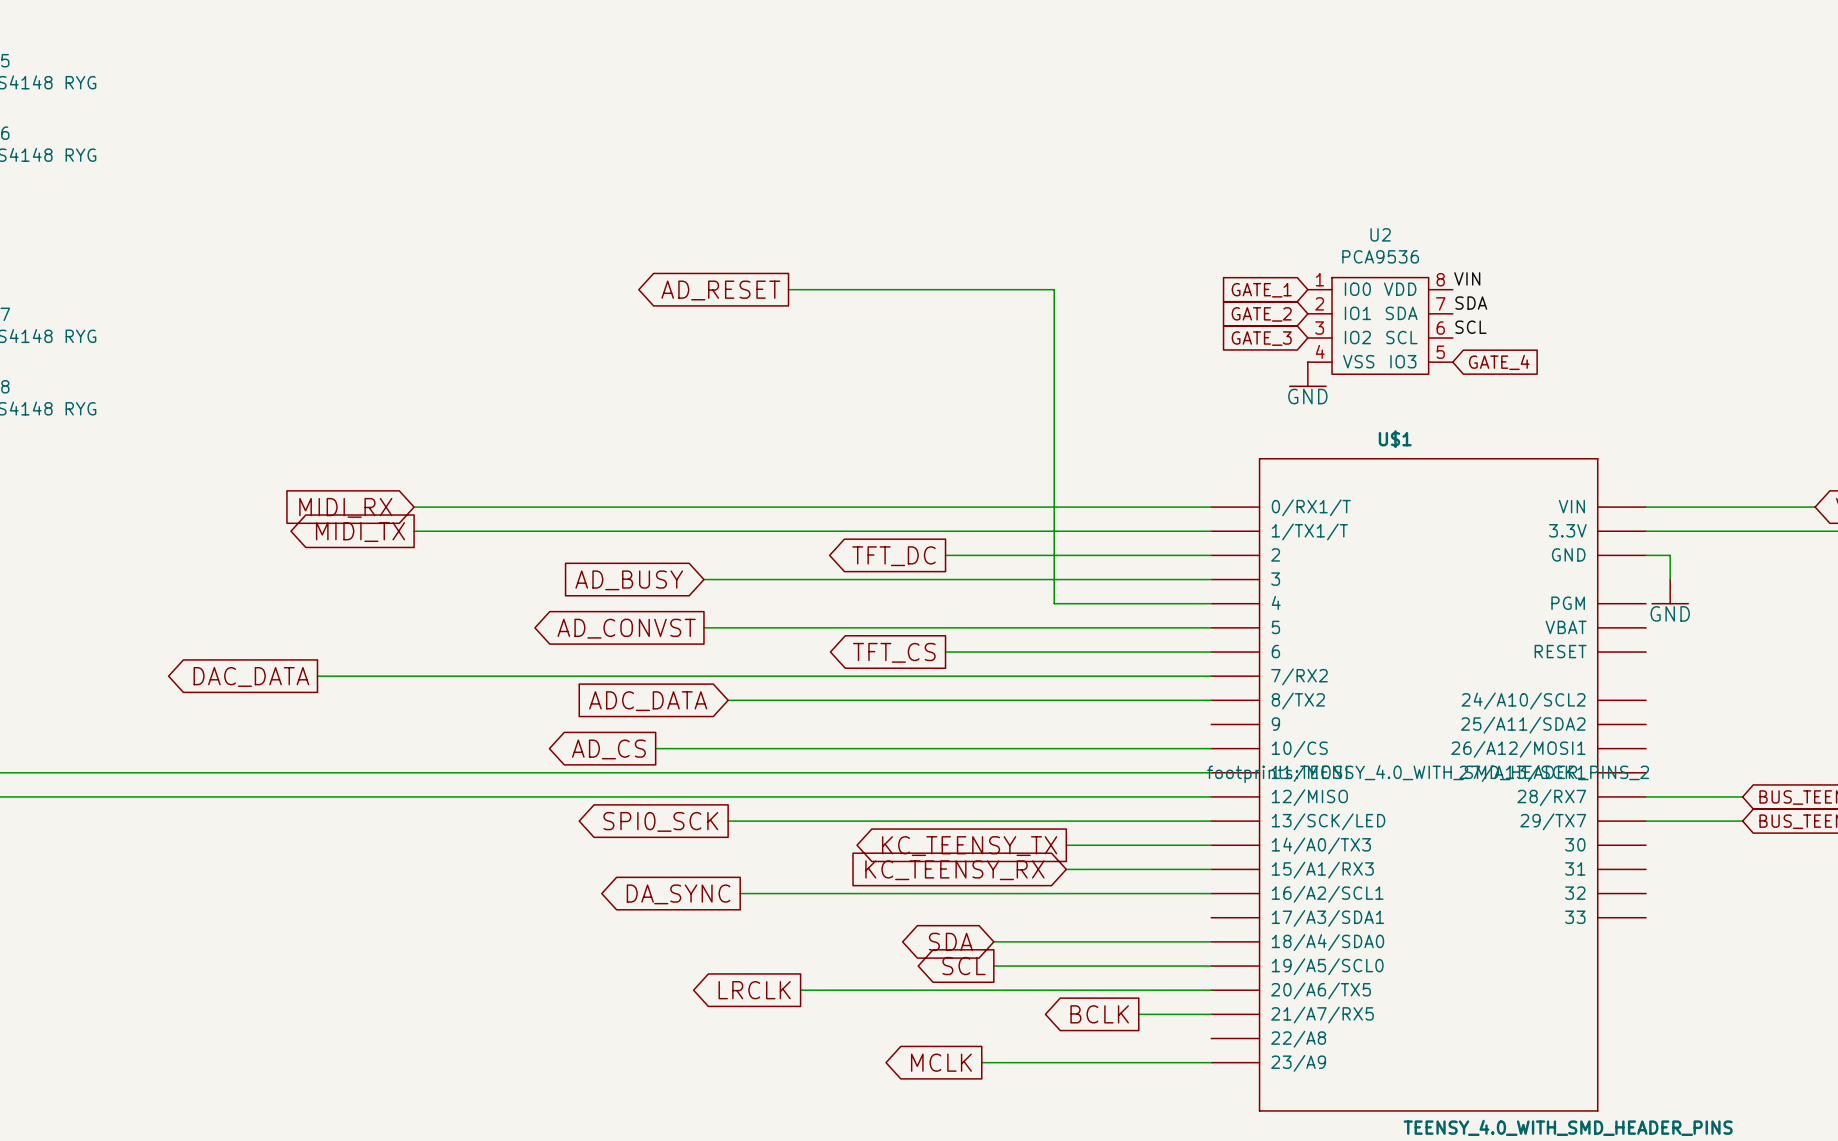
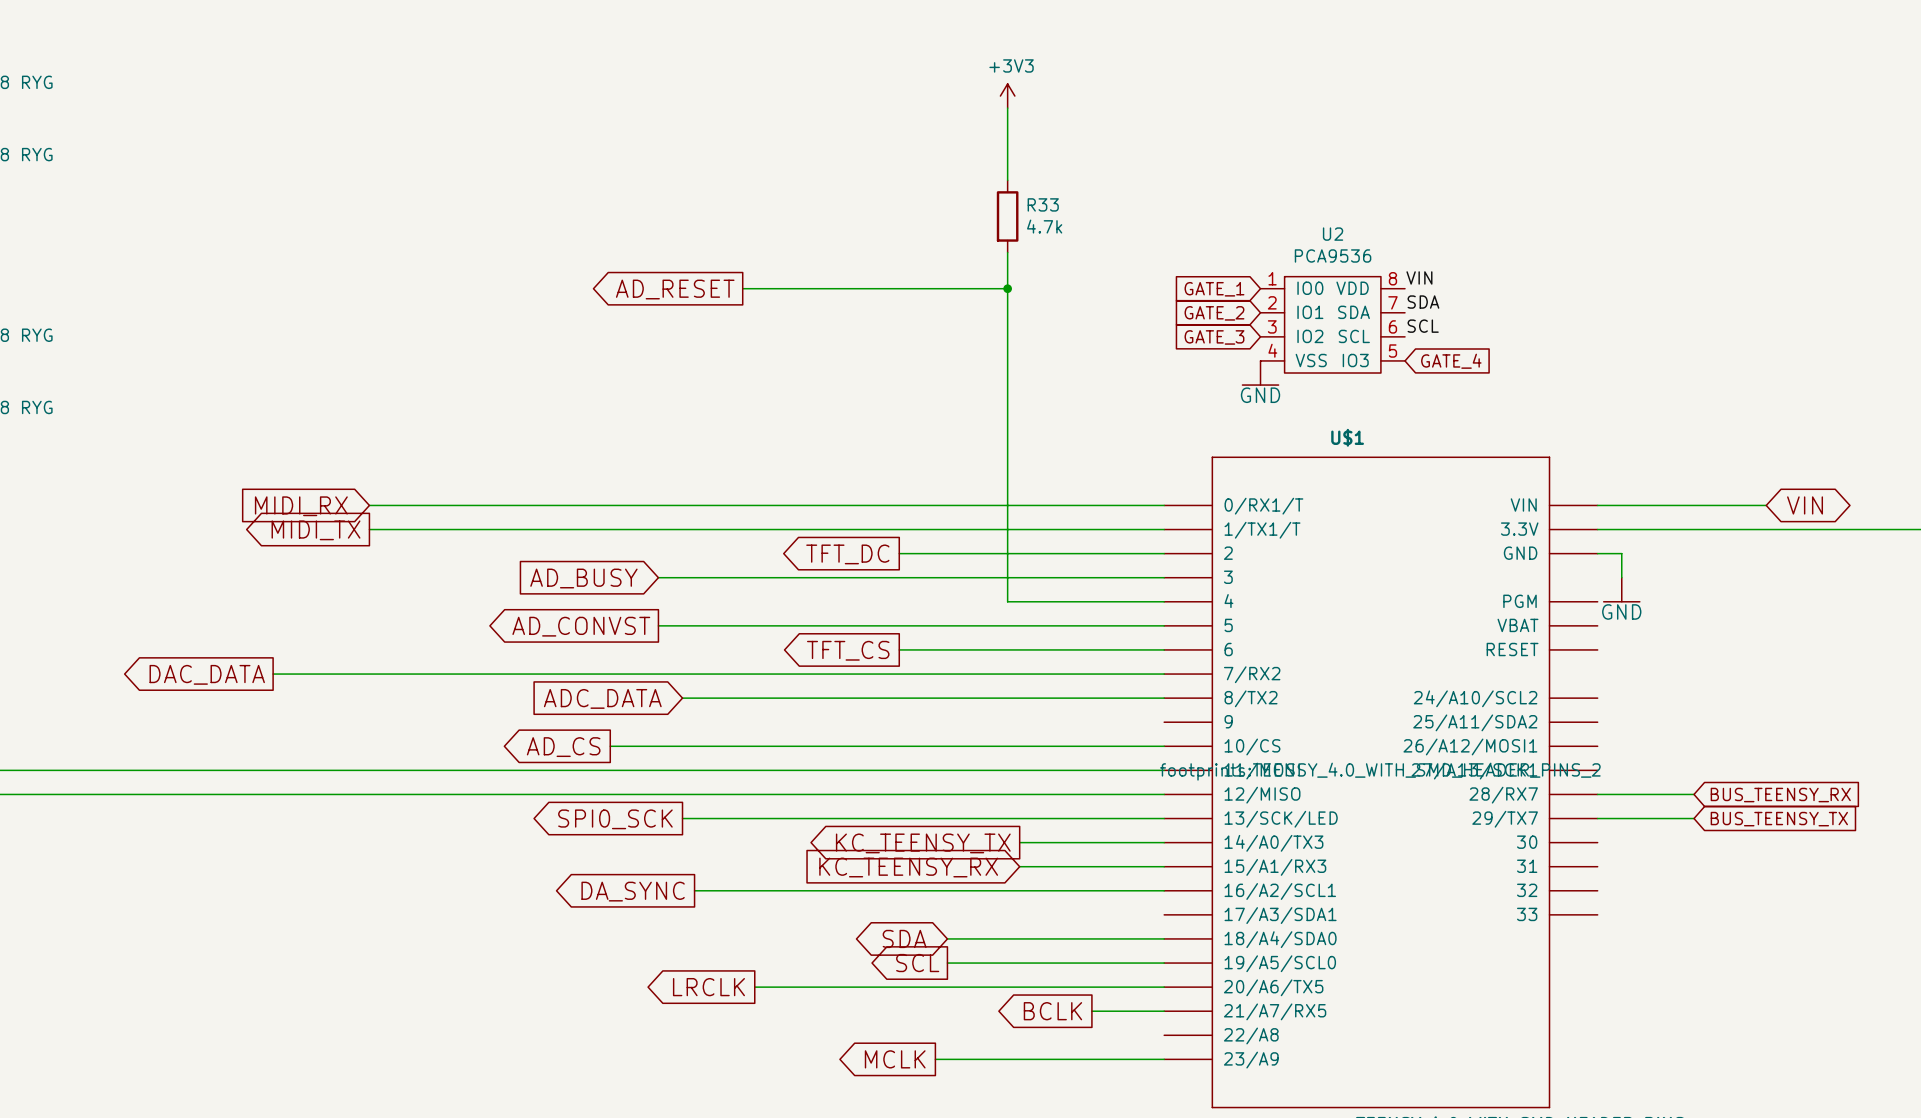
power symbol: none -> +3V3 (1007, 96)
wire: none -> (1007, 108) (1007, 180)
R33: none -> 4.7k (1007, 216)
wire: none -> (1007, 252) (1007, 288)
junction: none -> (1007, 288)

